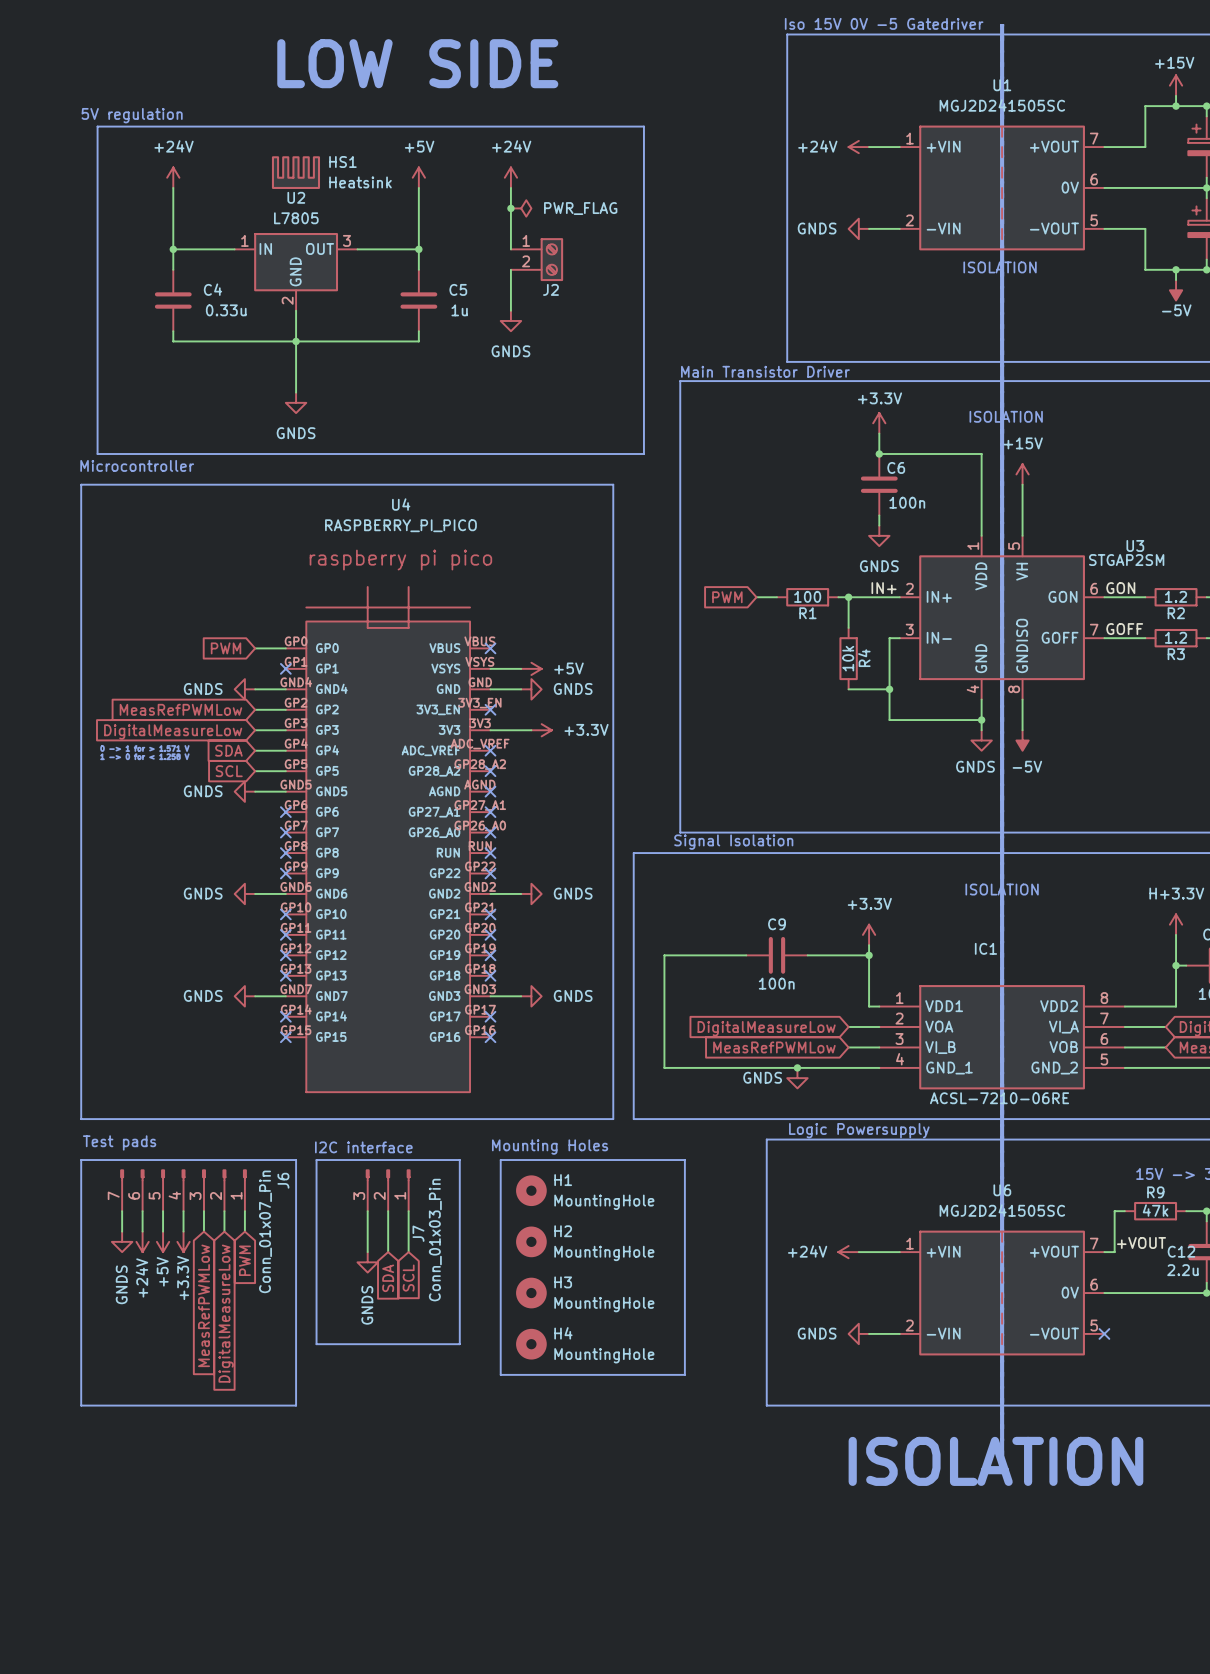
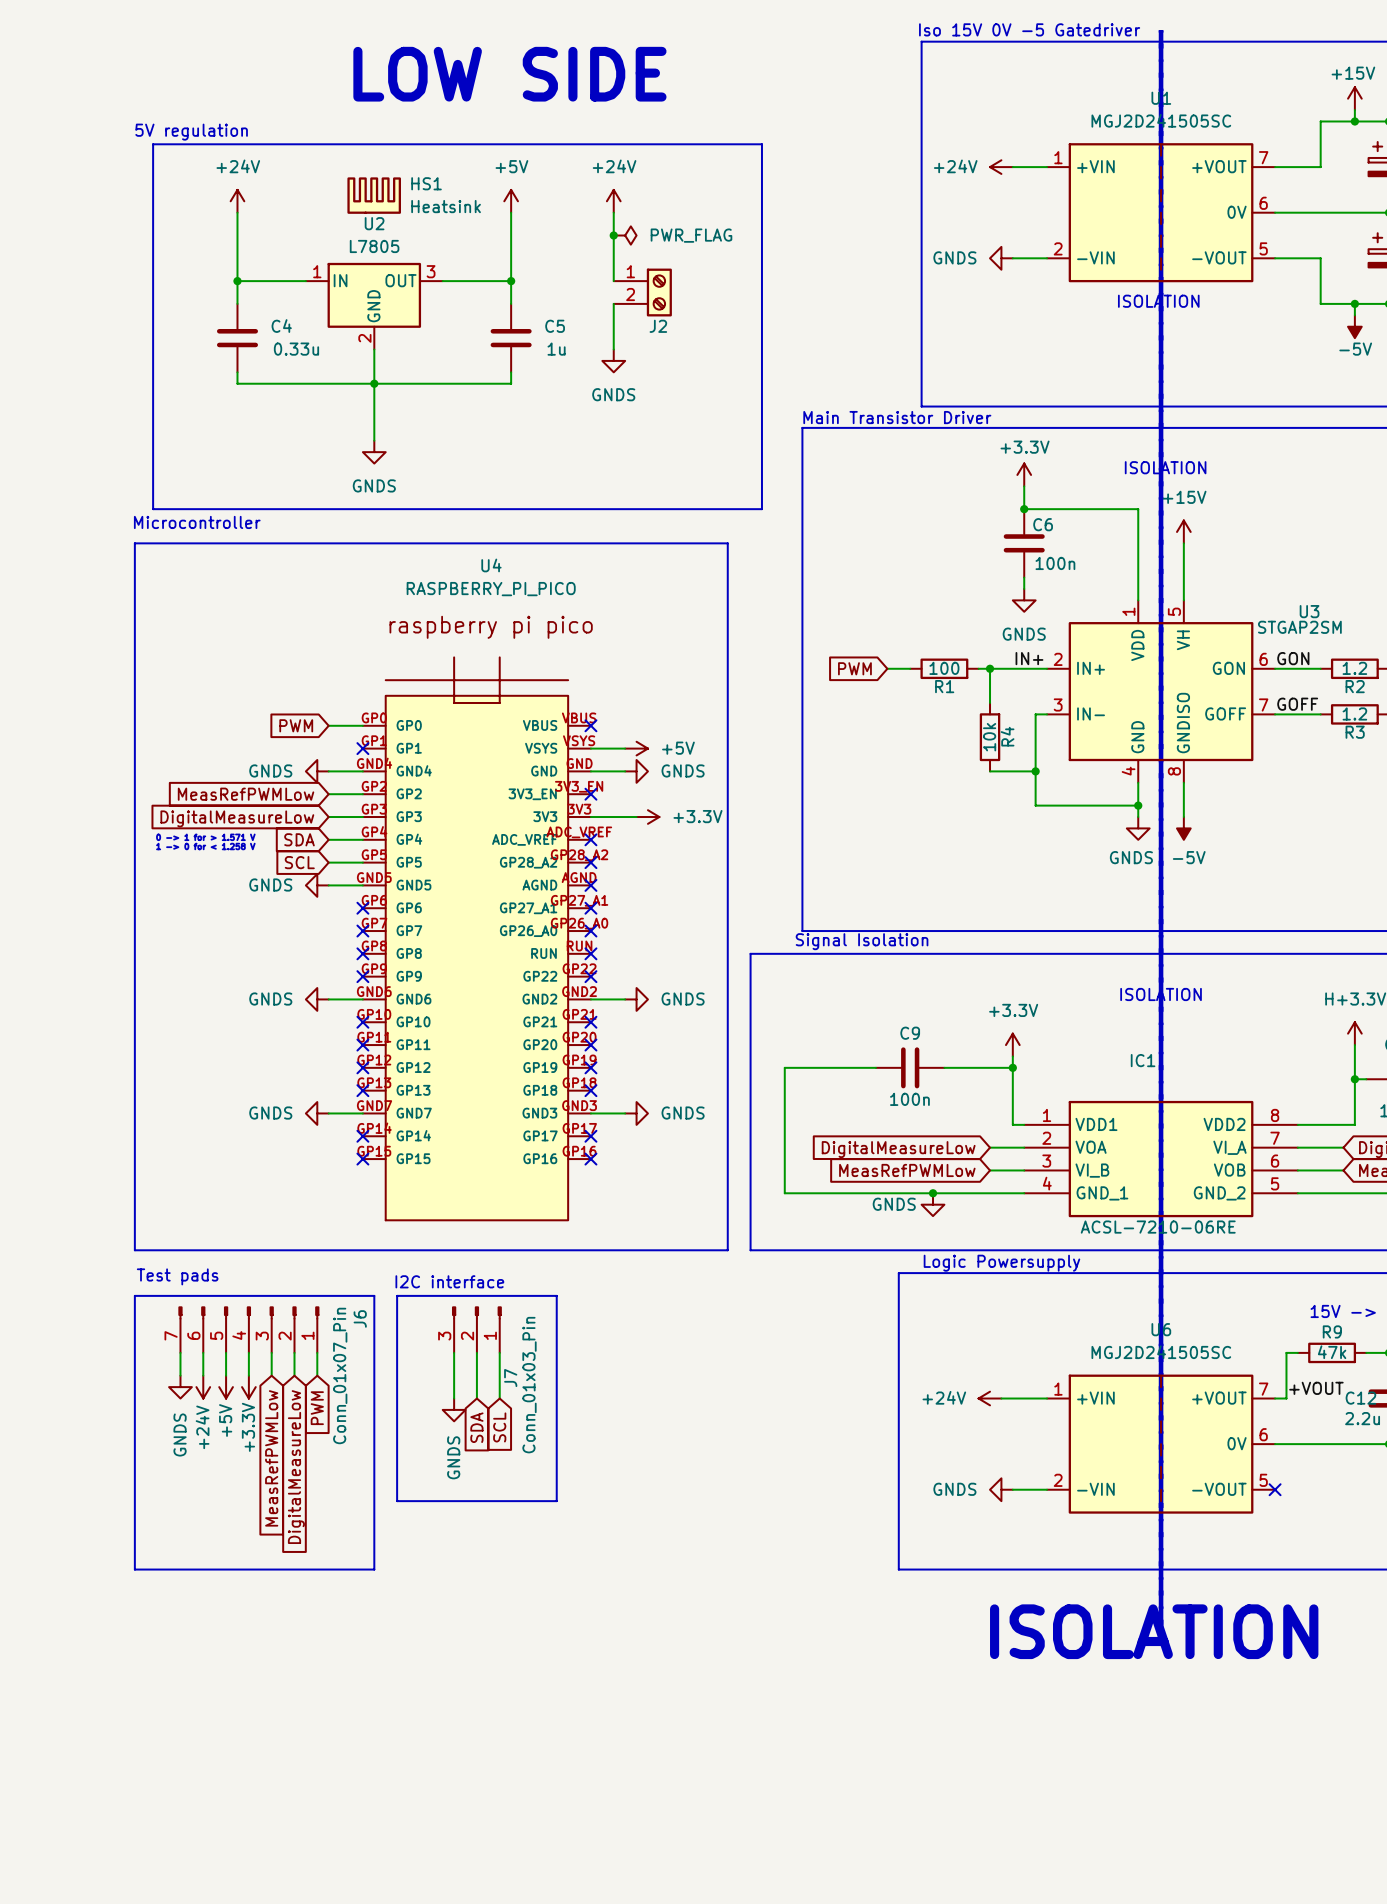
text: Mounting Holes (550, 1147) -> none
line: (500, 1160) (684, 1160) (684, 1374) (500, 1374) (500, 1160) -> none
H1: MountingHole (531, 1190) -> none
H2: MountingHole (531, 1241) -> none
H3: MountingHole (531, 1293) -> none
H4: MountingHole (531, 1344) -> none

